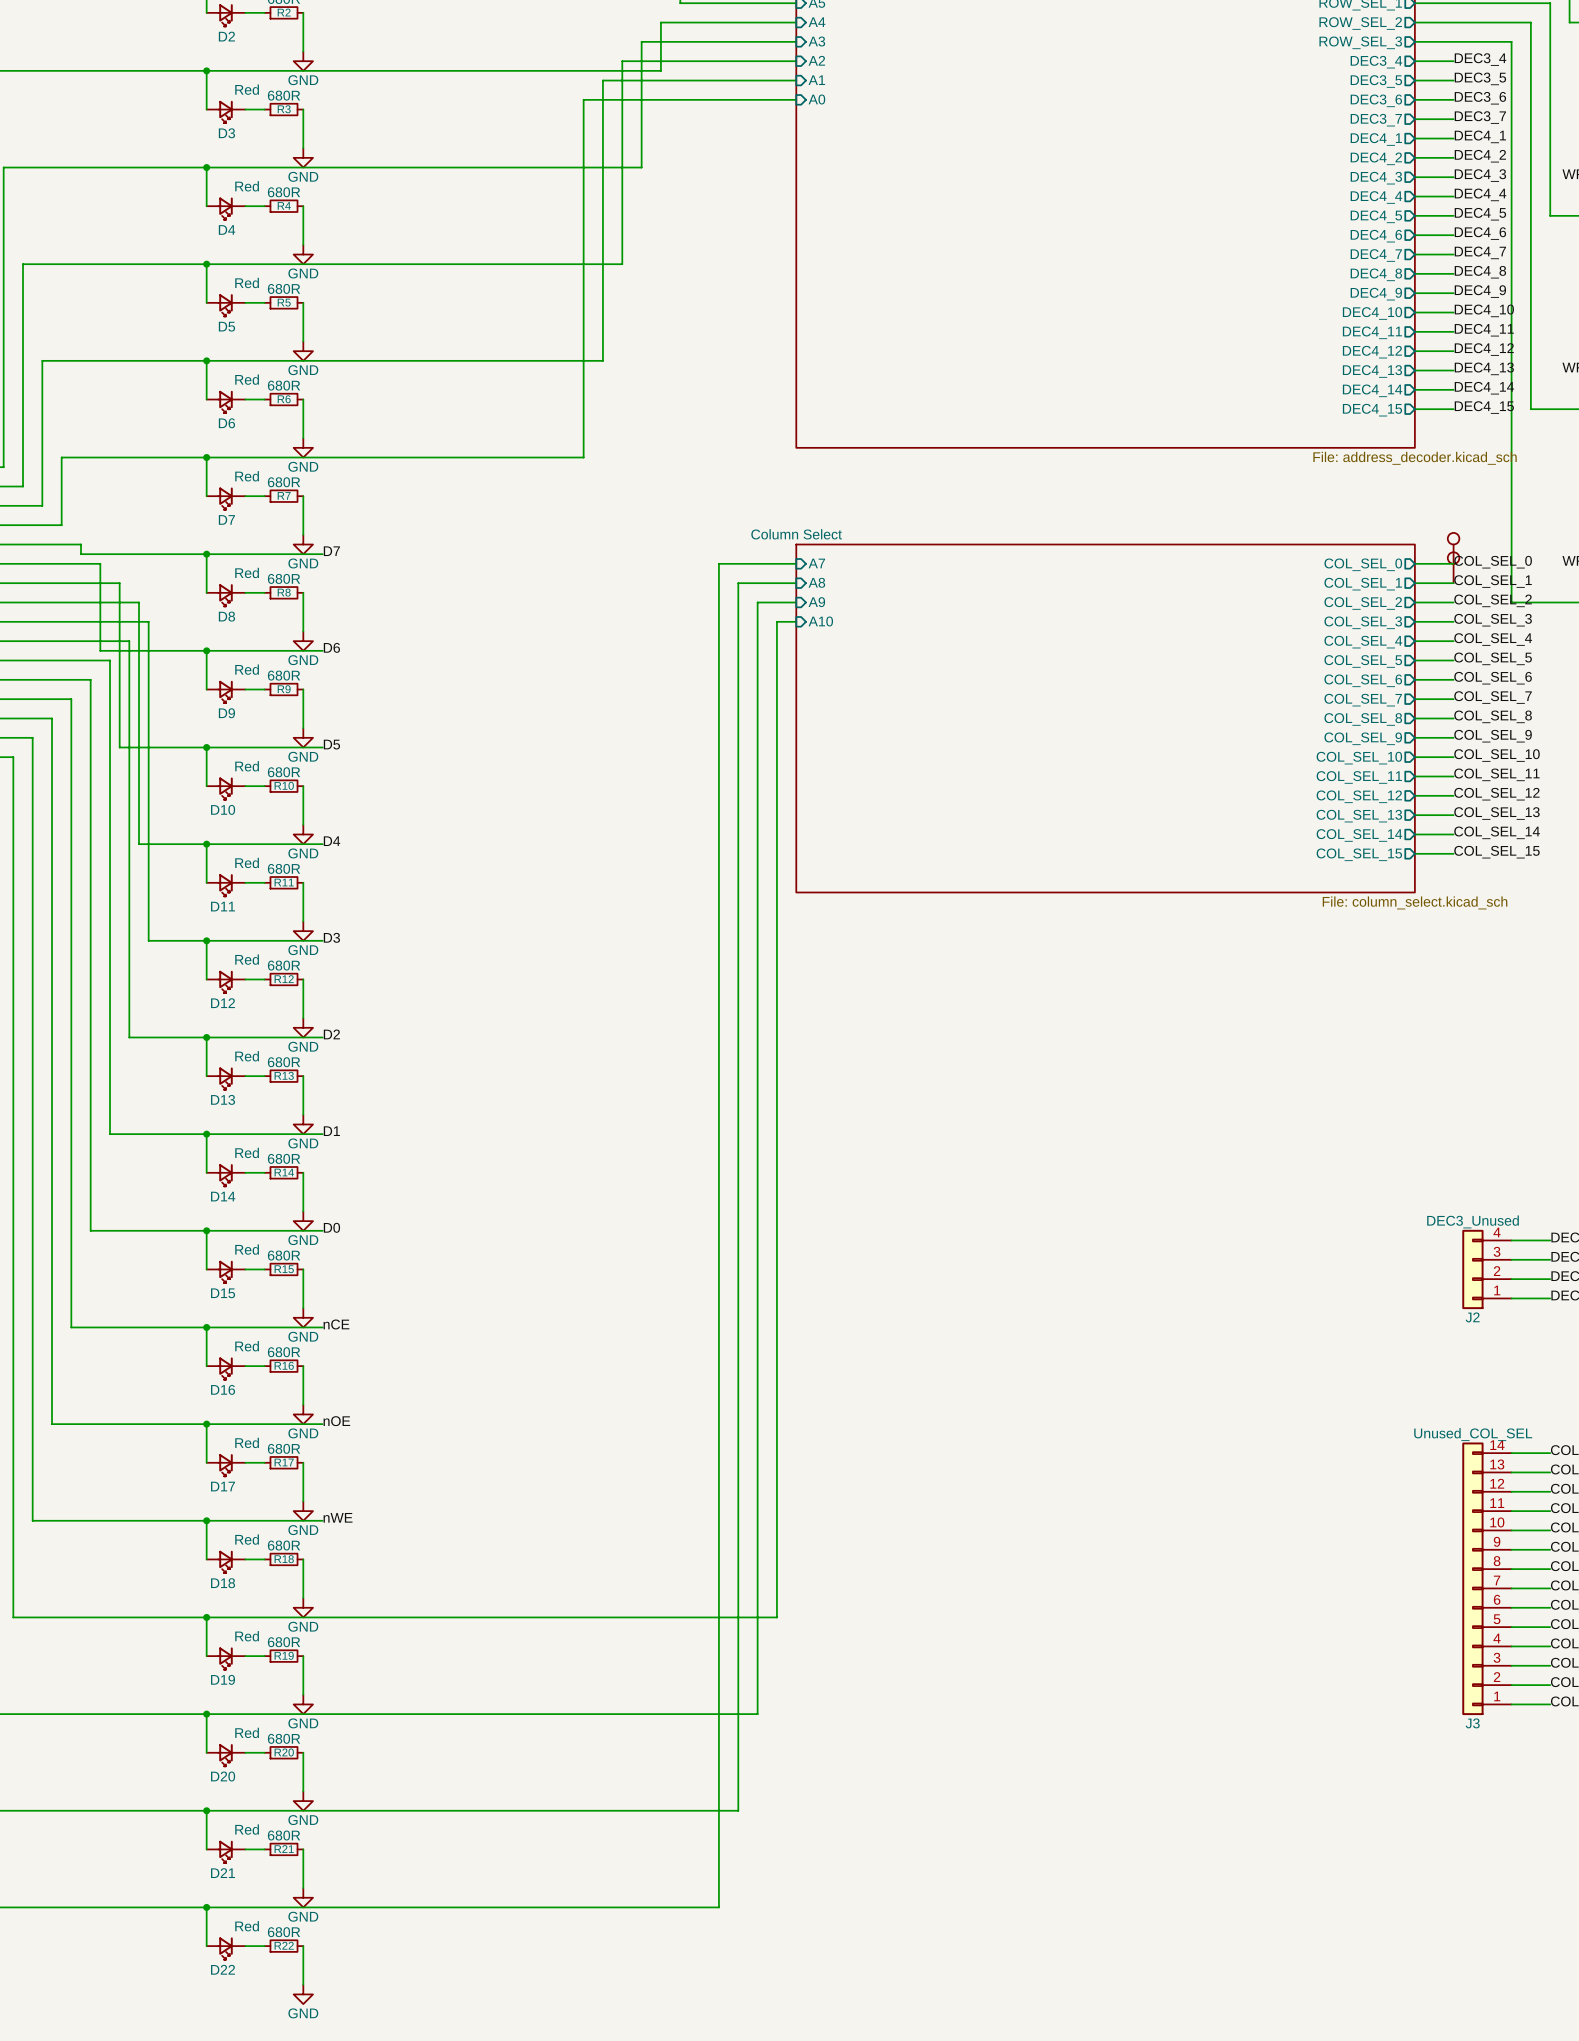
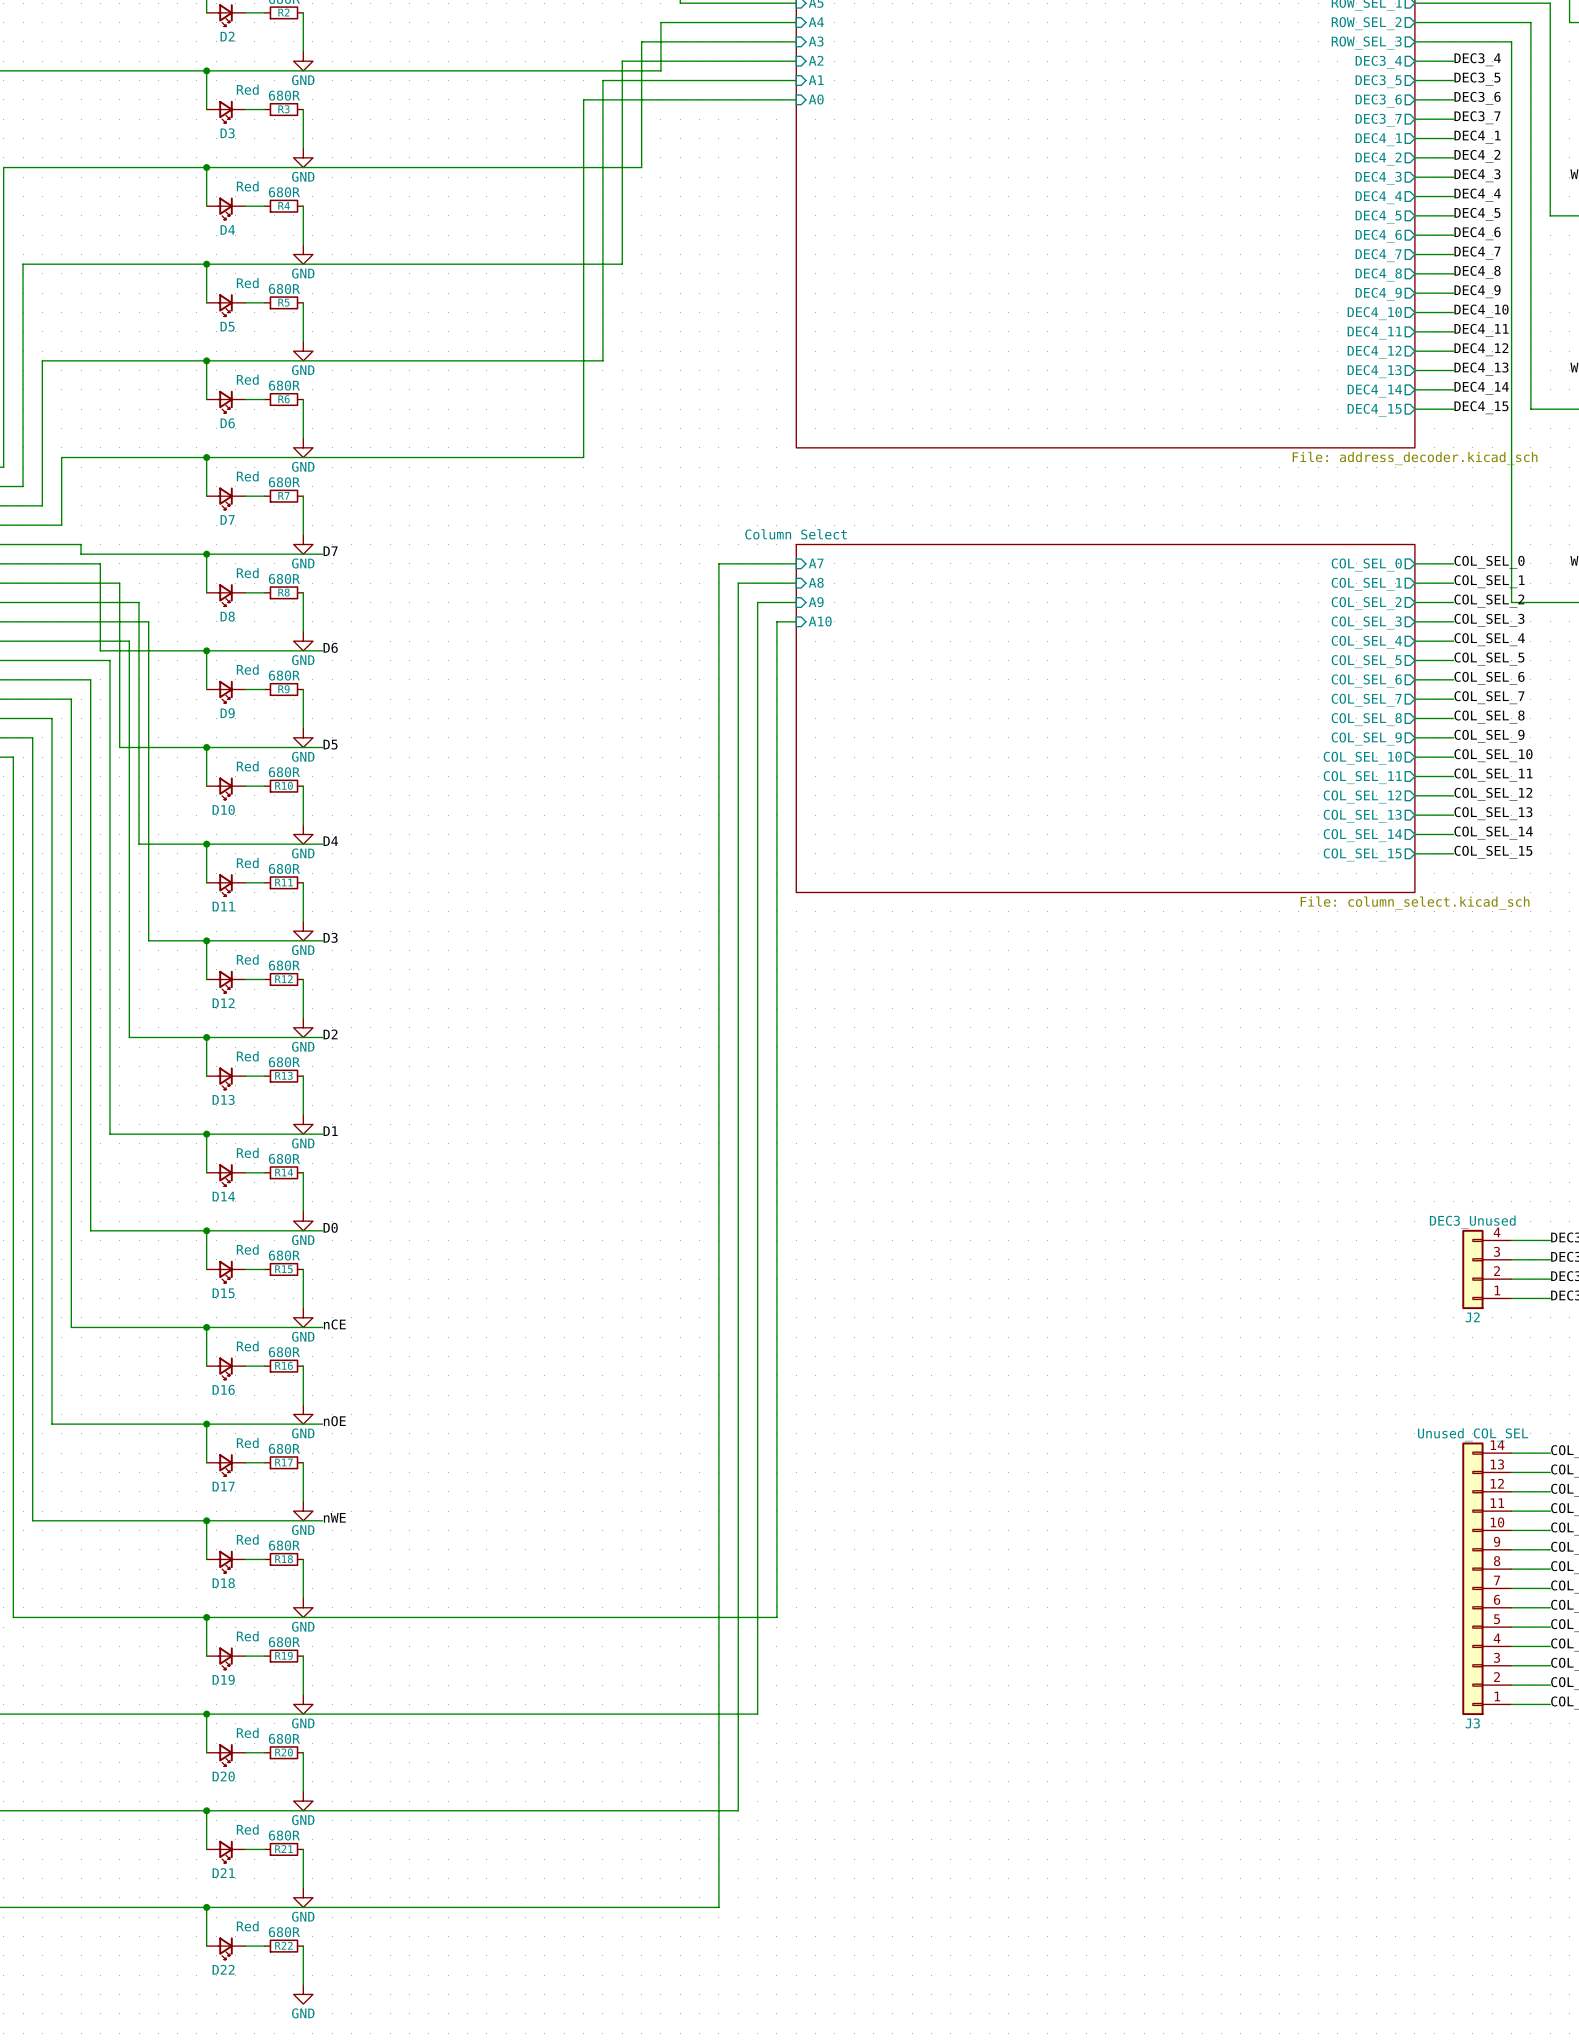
power symbol: (1453, 548) -> none
power symbol: (1453, 567) -> none

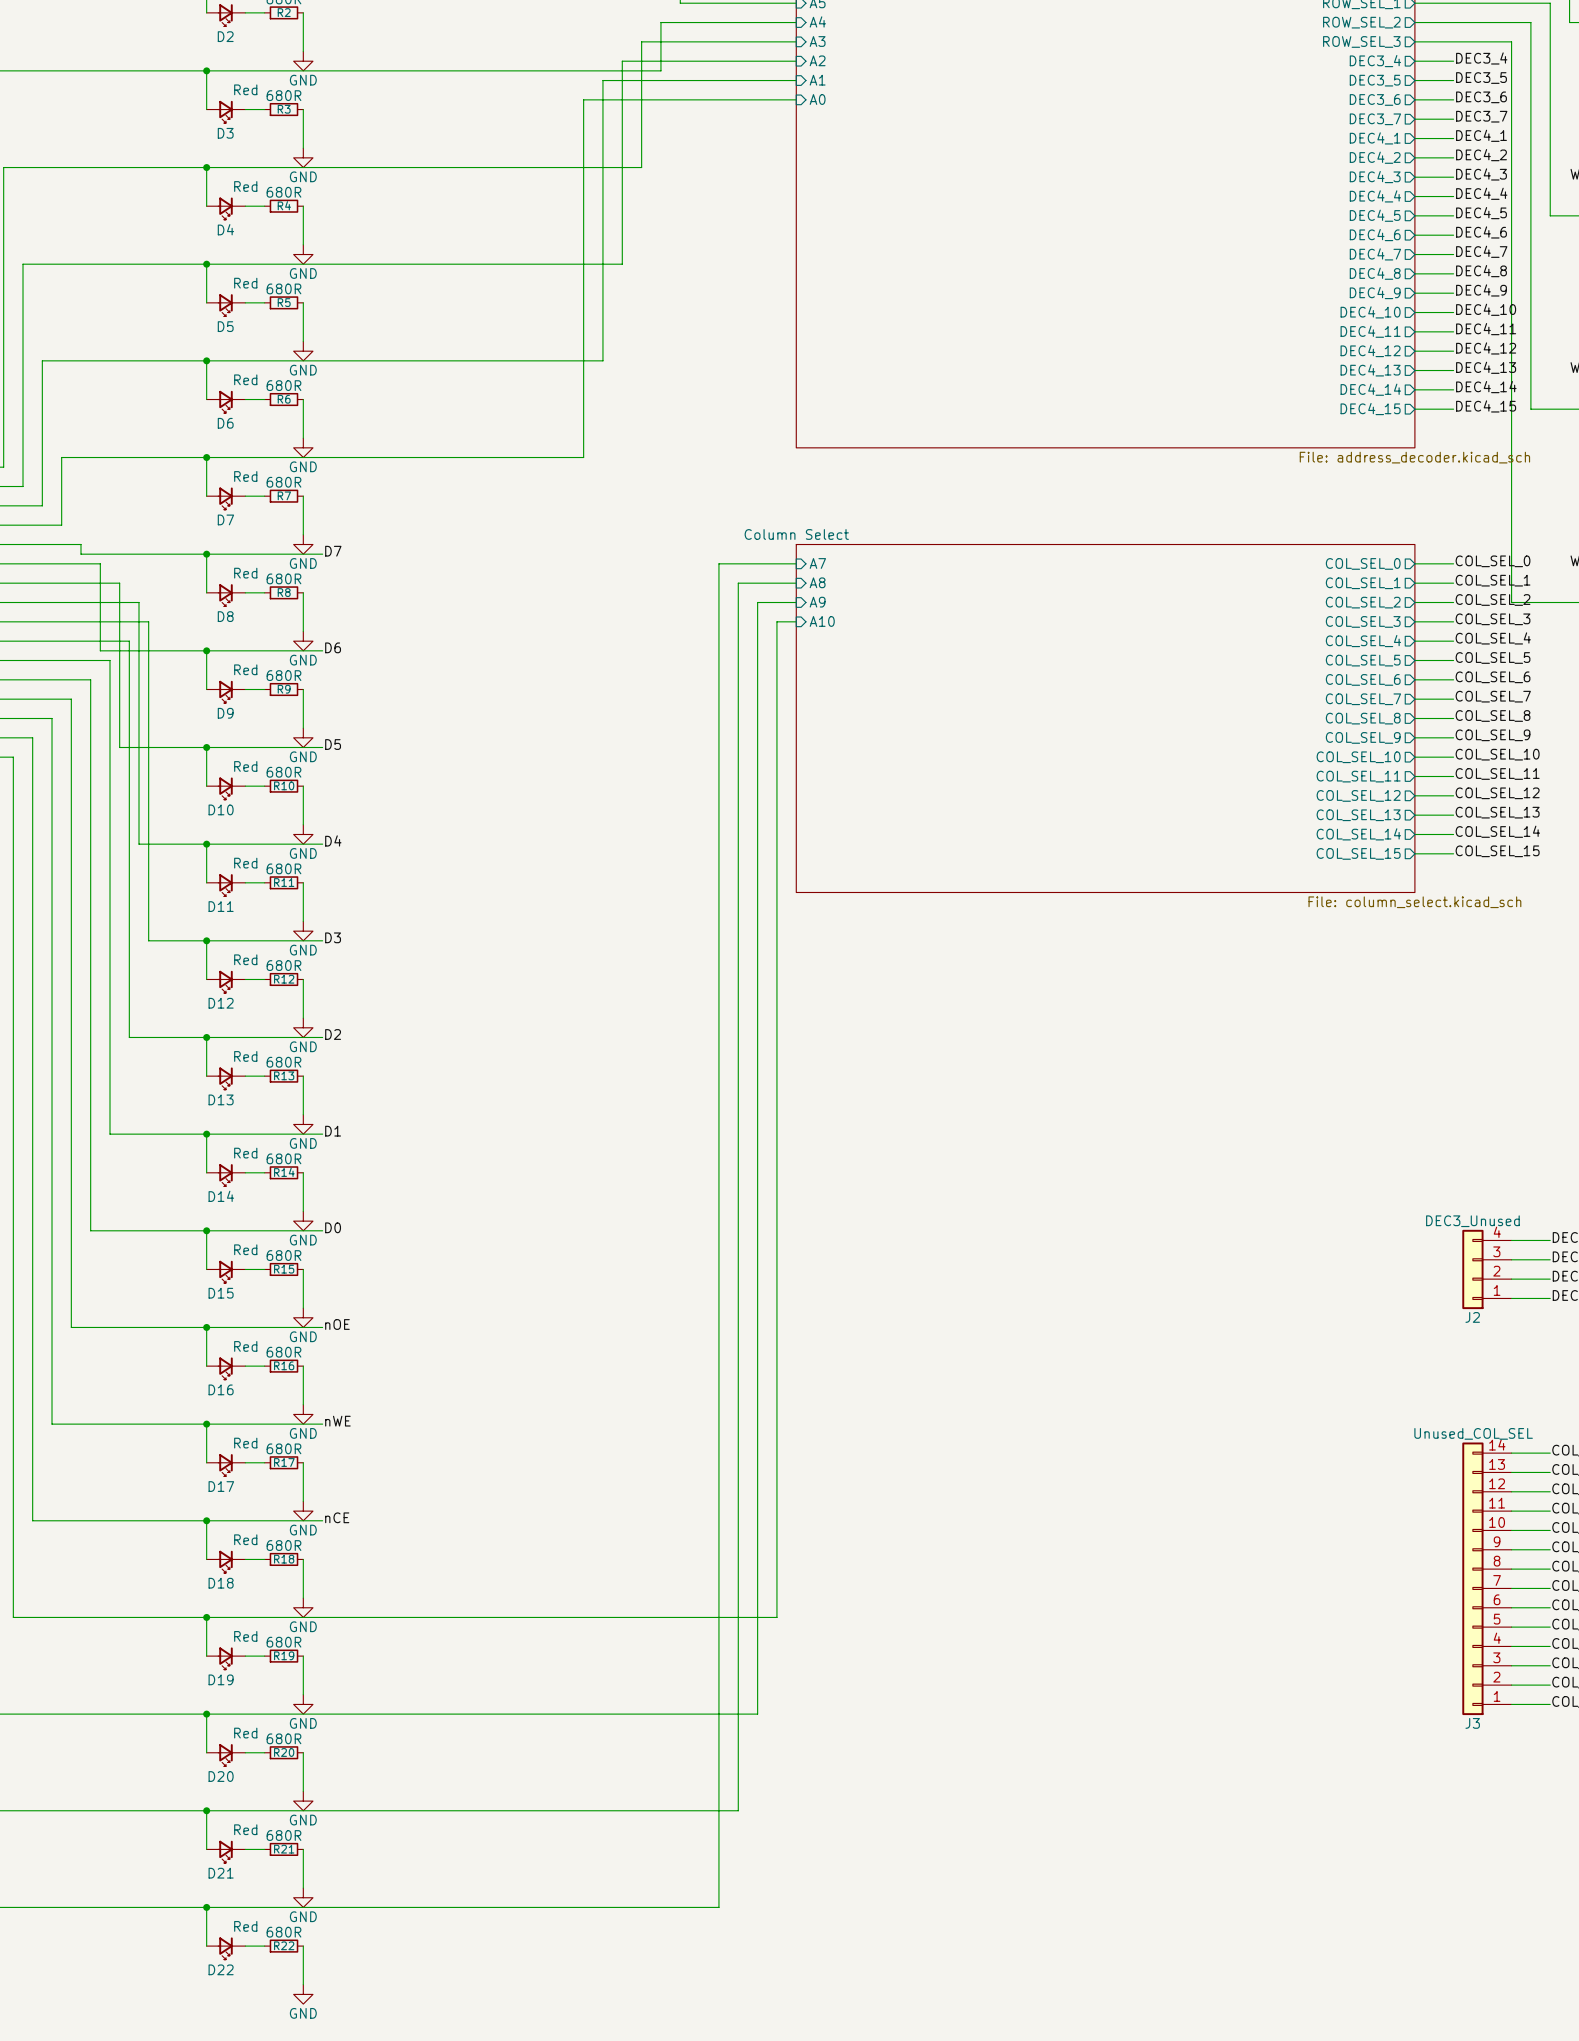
label: nCE (334, 1324) -> nOE (337, 1324)
label: nOE (334, 1421) -> nWE (337, 1421)
label: nWE (334, 1517) -> nCE (337, 1517)

